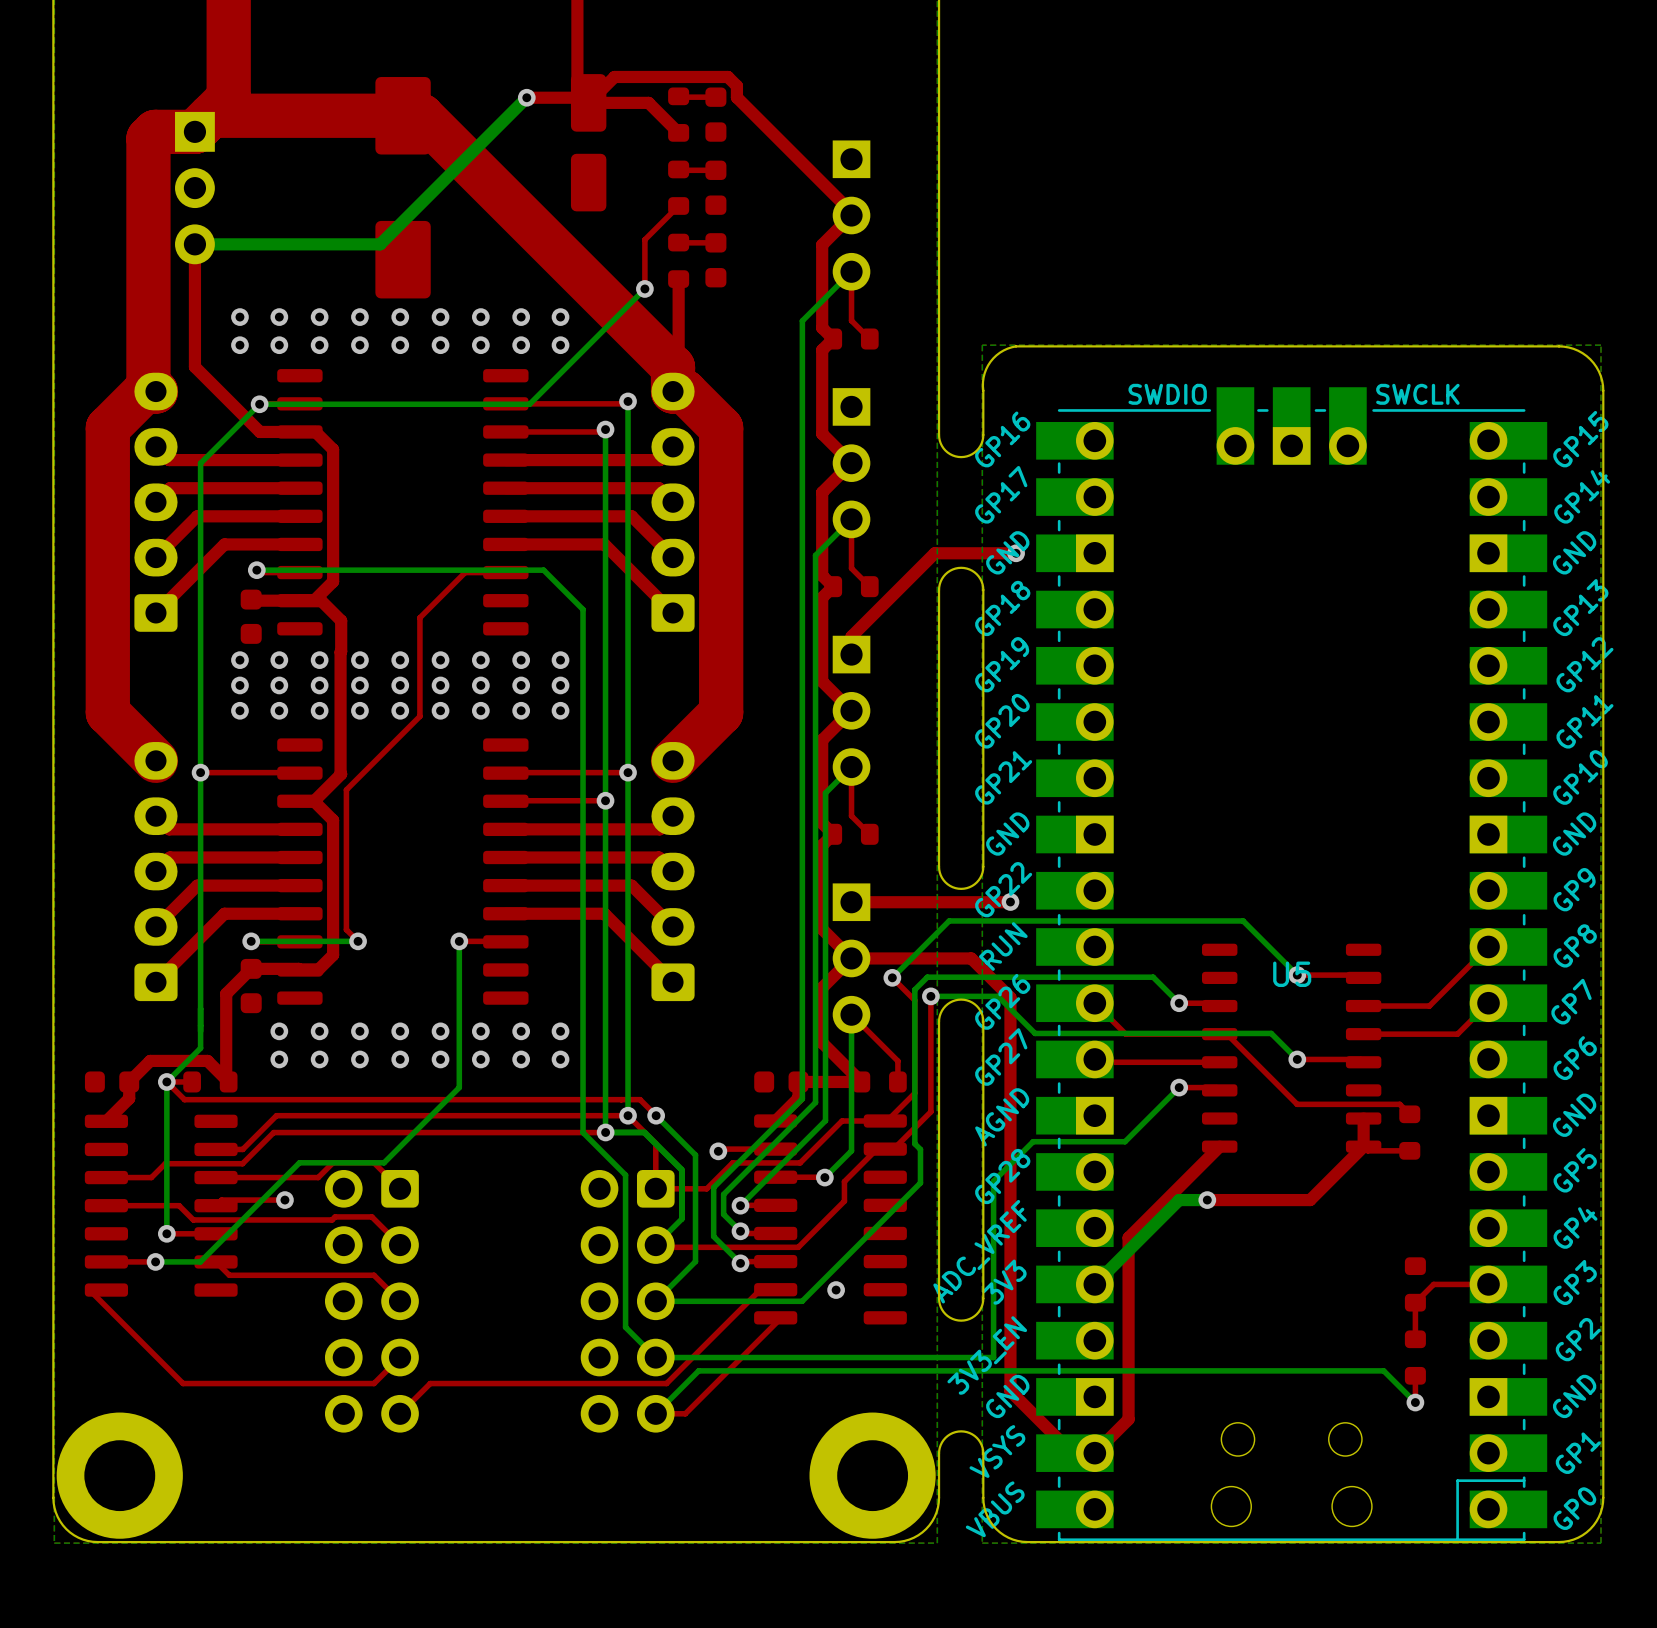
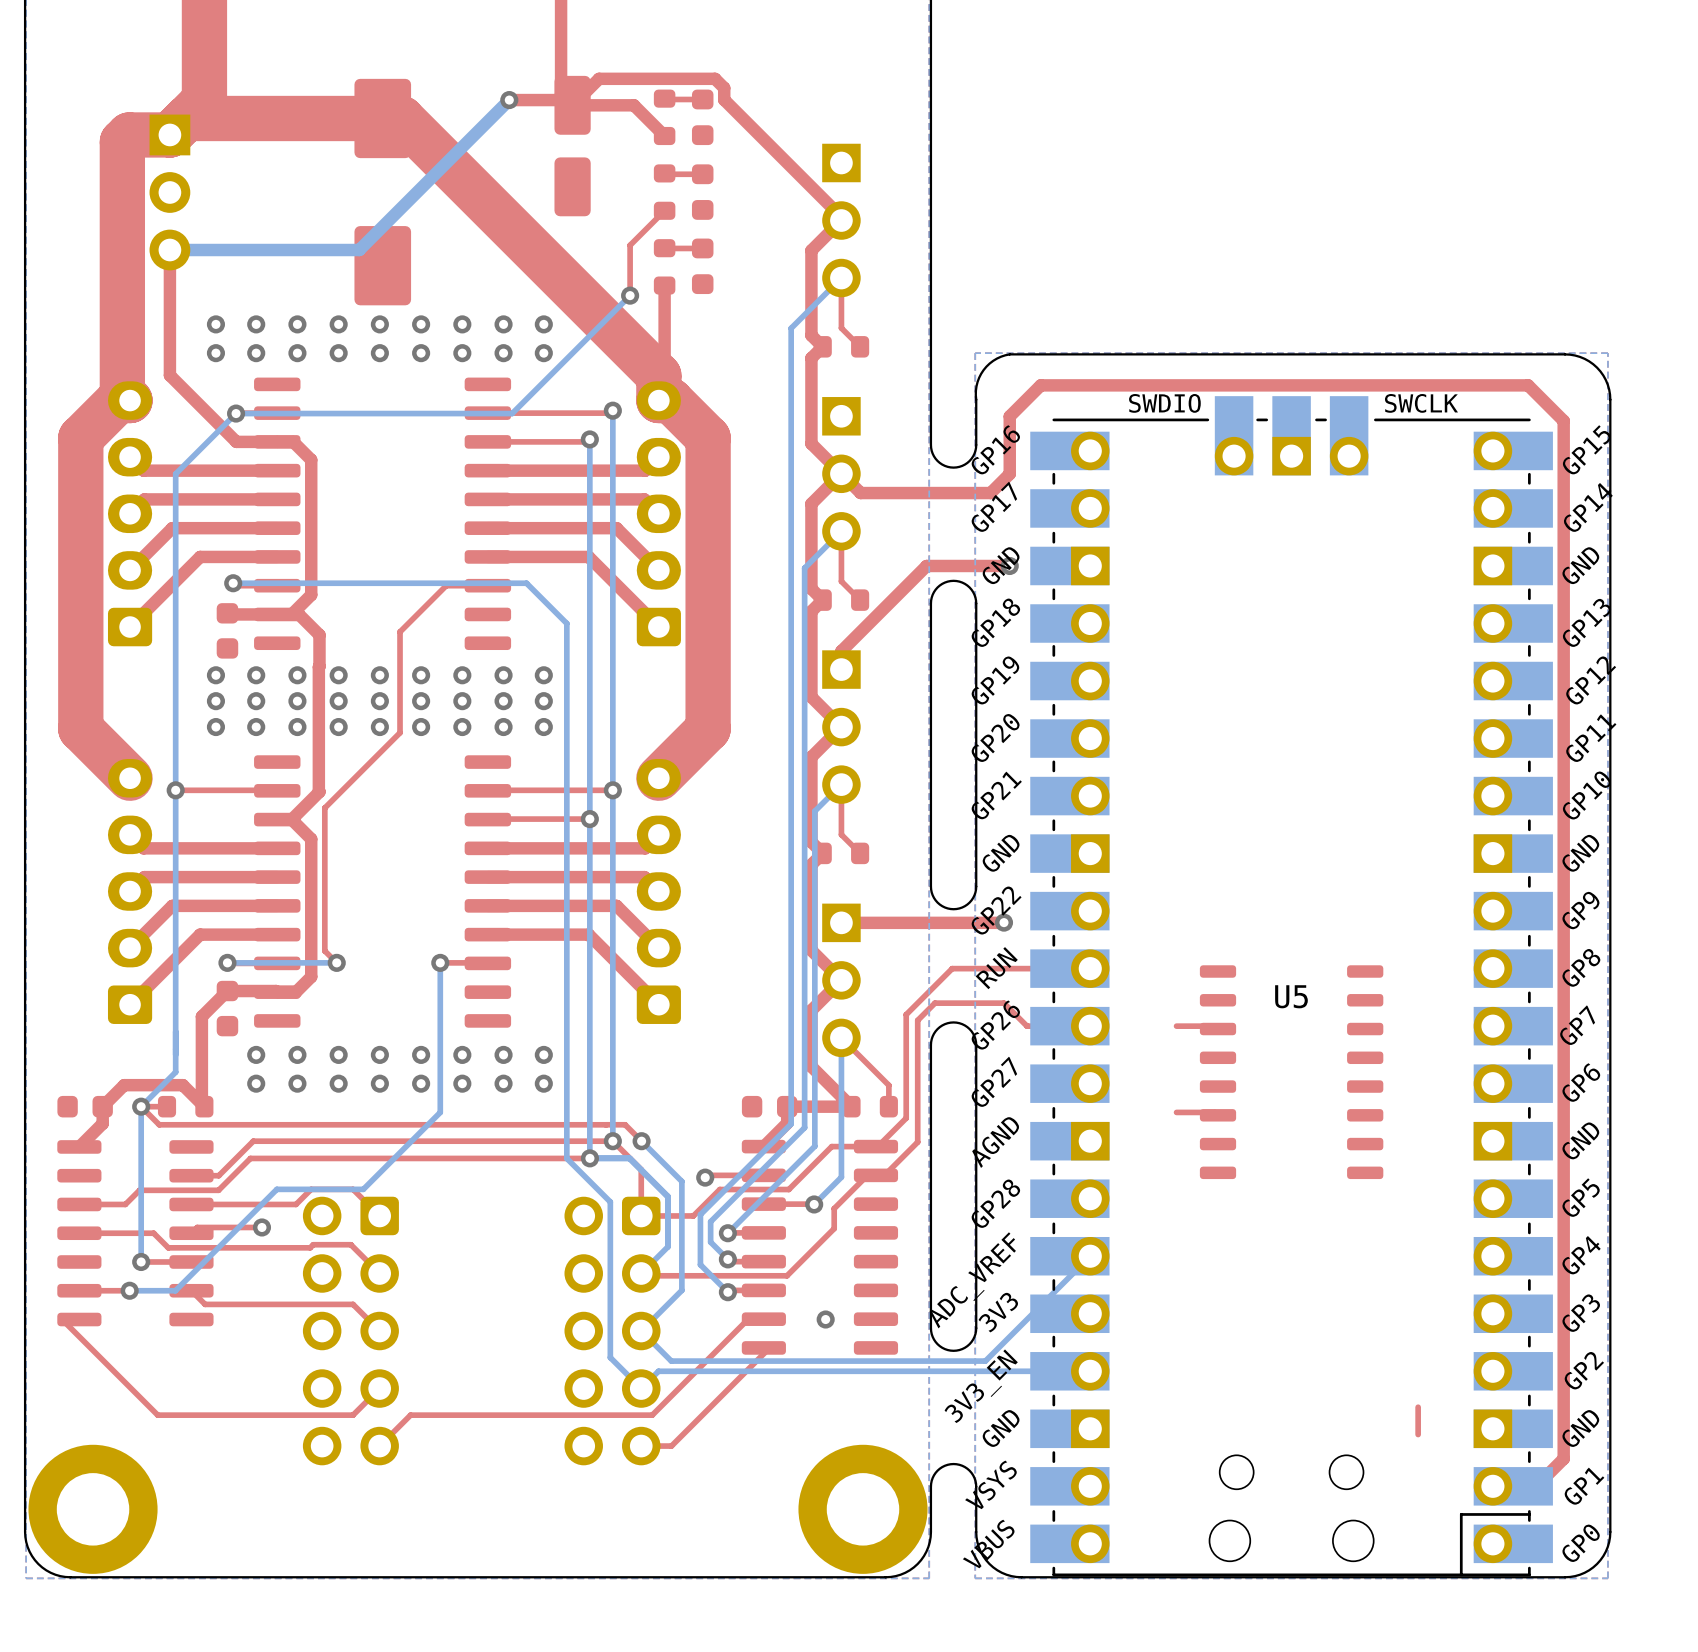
top track: none -> (841, 473) (860, 493) (990, 493) (1009, 473) (1009, 416) (1040, 385) (1528, 385) (1563, 420) (1563, 1458) (1536, 1486) (1492, 1486)
top track: (1488, 946) (1429, 1006) (1363, 1006) -> none
top track: (851, 958) (971, 958) (1010, 997) (1010, 1391) (1072, 1453) (1094, 1453) (1128, 1419) (1128, 1237) (1219, 1146) -> none
top track: (1297, 975) (1360, 975) (1363, 977) -> none
bottom track: (1297, 975) (1243, 920) (949, 920) (892, 977) -> none
via: (1297, 975) -> none
top track: (892, 977) (914, 1000) -> (1090, 968) (952, 968) (906, 1014) (906, 1023)
via: (892, 977) -> none
top track: (930, 996) (930, 1111) (926, 1116) -> (1090, 1026) (1027, 1026) (1003, 1003) (934, 1003) (917, 1020) (917, 1142)
bottom track: (930, 996) (997, 996) (1035, 1033) (1271, 1033) (1297, 1059) -> none
via: (930, 996) -> none
top track: (1094, 1003) (1125, 1034) (1226, 1034) (1297, 1104) (1399, 1104) (1409, 1114) -> none
bottom track: (1179, 1003) (1153, 977) (927, 977) (914, 989) (914, 1143) (920, 1149) (920, 1182) (802, 1301) (655, 1301) -> (1090, 1256) (985, 1361) (671, 1361) (641, 1331)
via: (1179, 1003) -> none
top track: (1488, 1003) (1457, 1034) (1363, 1034) -> none
top track: (1094, 1059) (1097, 1062) (1219, 1062) -> none
top track: (1297, 1059) (1360, 1059) (1363, 1062) -> none
via: (1297, 1059) -> none
bottom track: (1179, 1087) (1125, 1141) (1033, 1141) (993, 1181) (993, 1357) (655, 1357) -> (1090, 1371) (658, 1371) (641, 1388)
via: (1179, 1087) -> none
top track: (1363, 1118) (1363, 1146) -> none
part: (1409, 1132) -> none
top track: (1363, 1146) (1310, 1200) (1207, 1200) -> none
top track: (1363, 1146) (1367, 1150) (1409, 1150) -> none
bottom track: (1207, 1200) (1179, 1200) (1094, 1284) -> none
via: (1207, 1200) -> none
part: (1415, 1284) -> none
top track: (1488, 1284) (1433, 1284) (1415, 1302) (1415, 1339) -> none
part: (1415, 1357) -> none
bottom track: (1415, 1402) (1383, 1370) (698, 1370) (655, 1413) -> none
via: (1415, 1402) -> none

